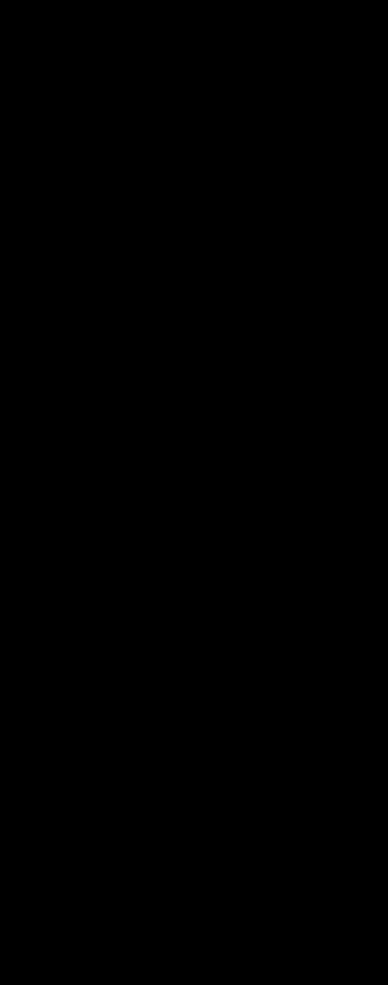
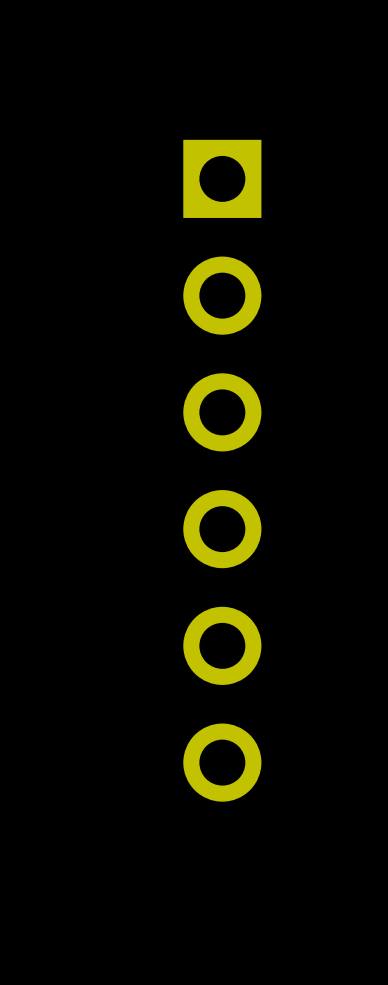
part: none -> (222, 470)

